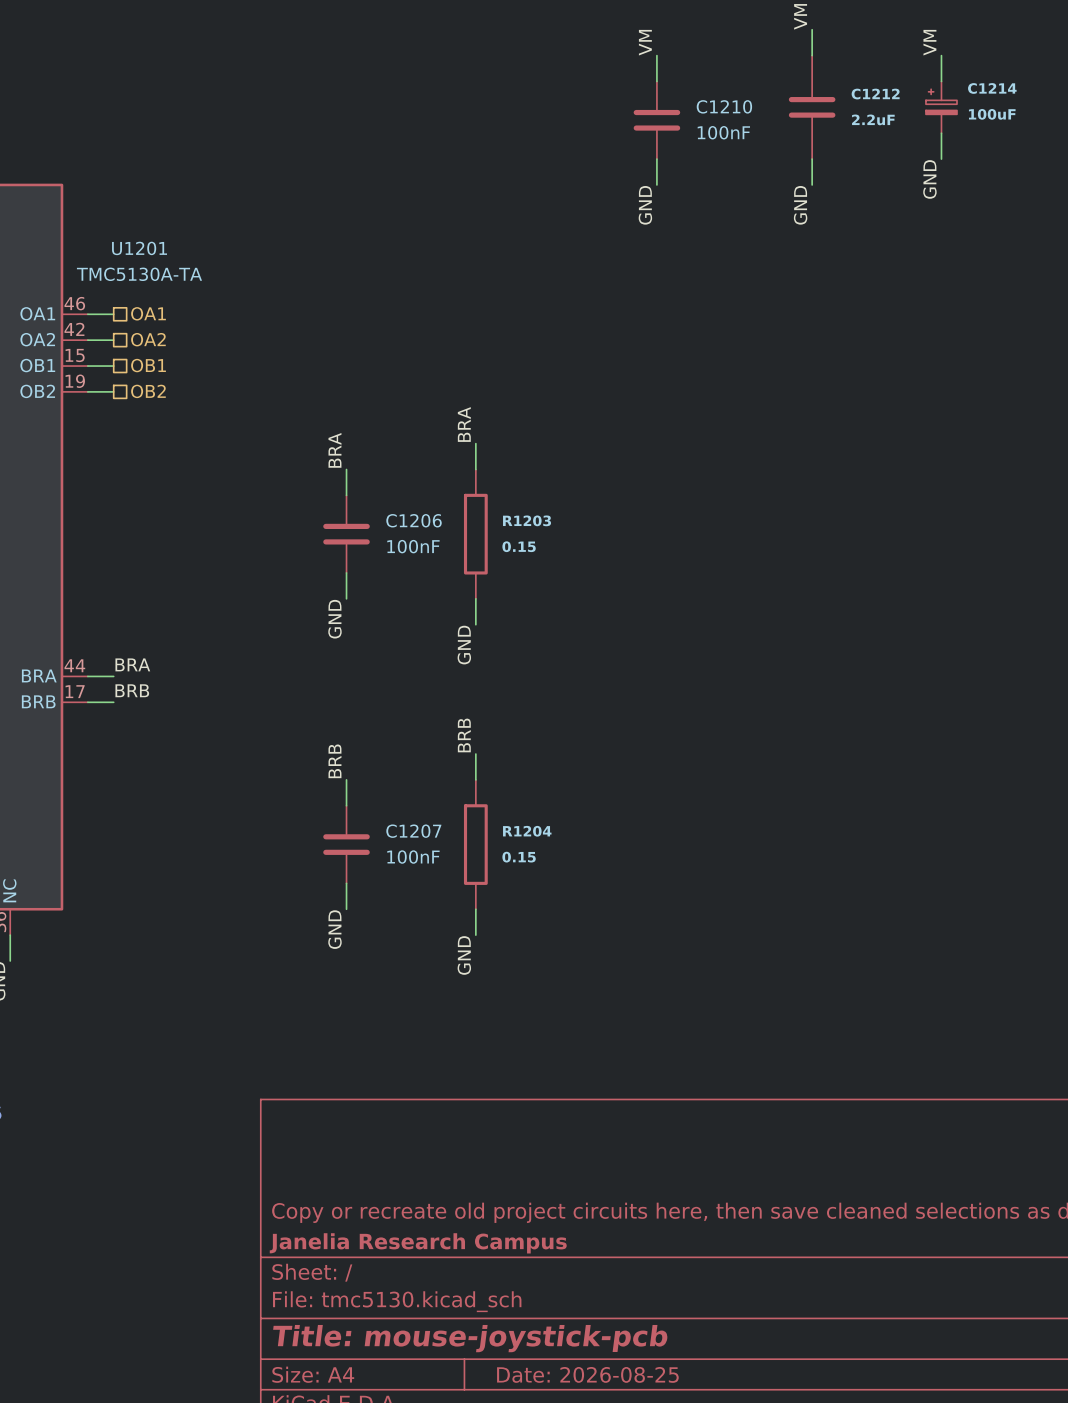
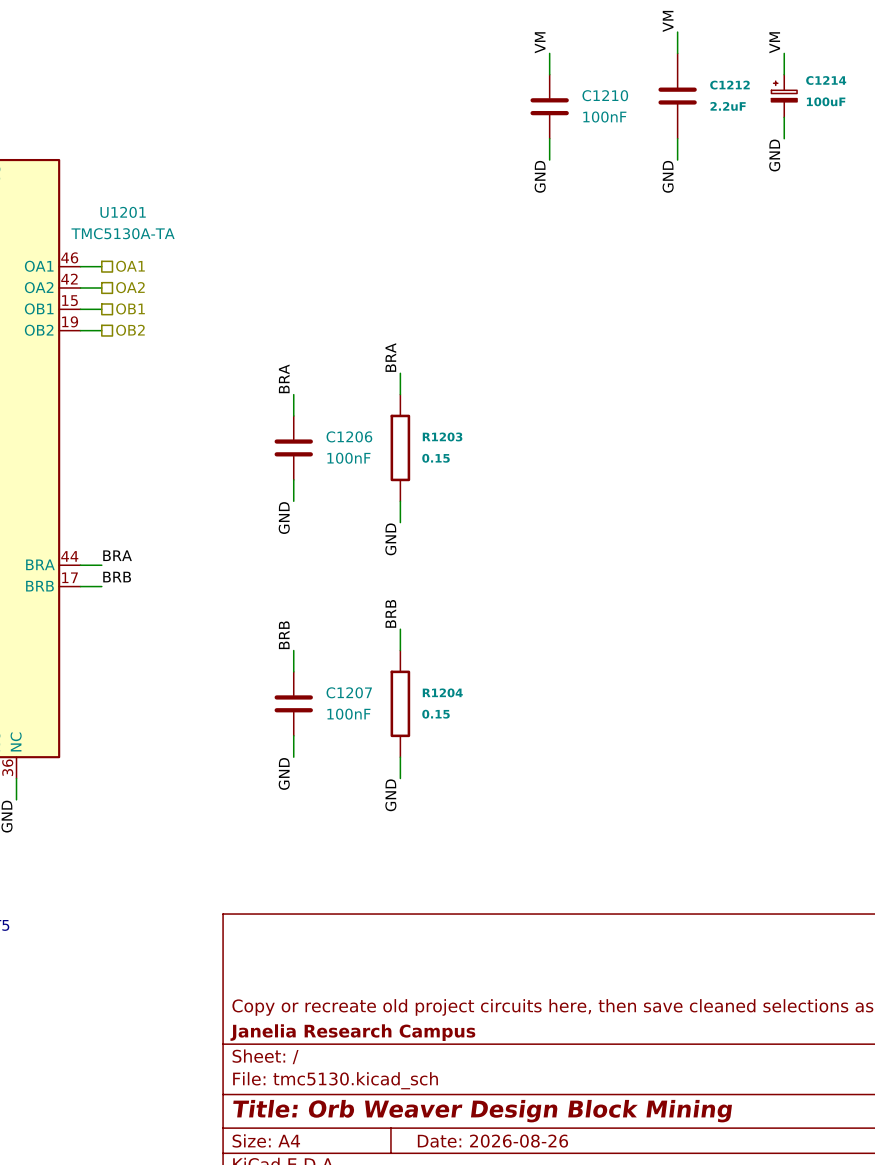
title block: Title: mouse-joystick-pcb (470, 1338) -> Title: Orb Weaver Design Block Mining (482, 1111)
title block: Date: 2026-08-25 (587, 1374) -> Date: 2026-08-26 (492, 1141)

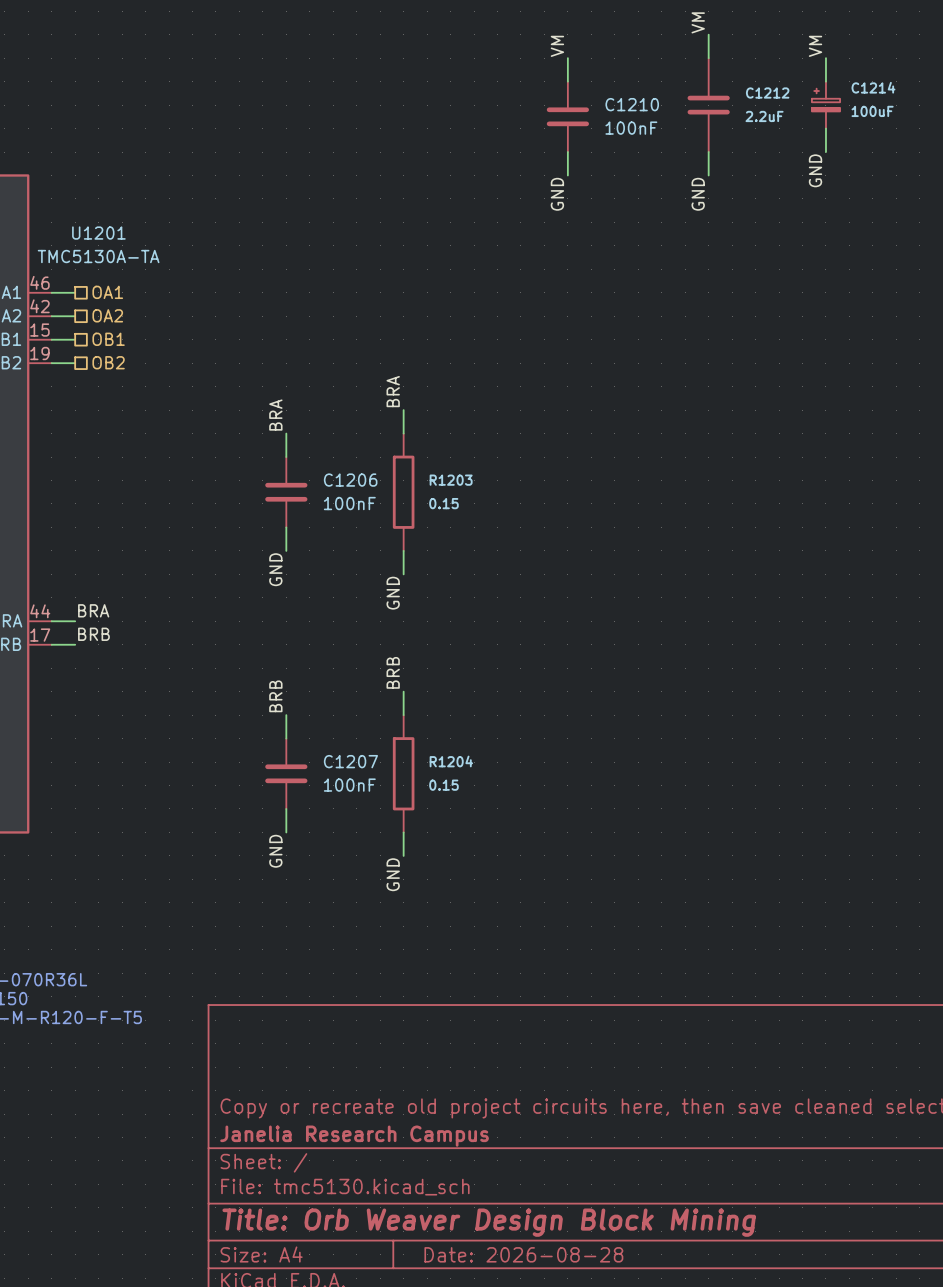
title block: Date: 2026-08-26 (492, 1141) -> Date: 2026-08-28 (523, 1254)

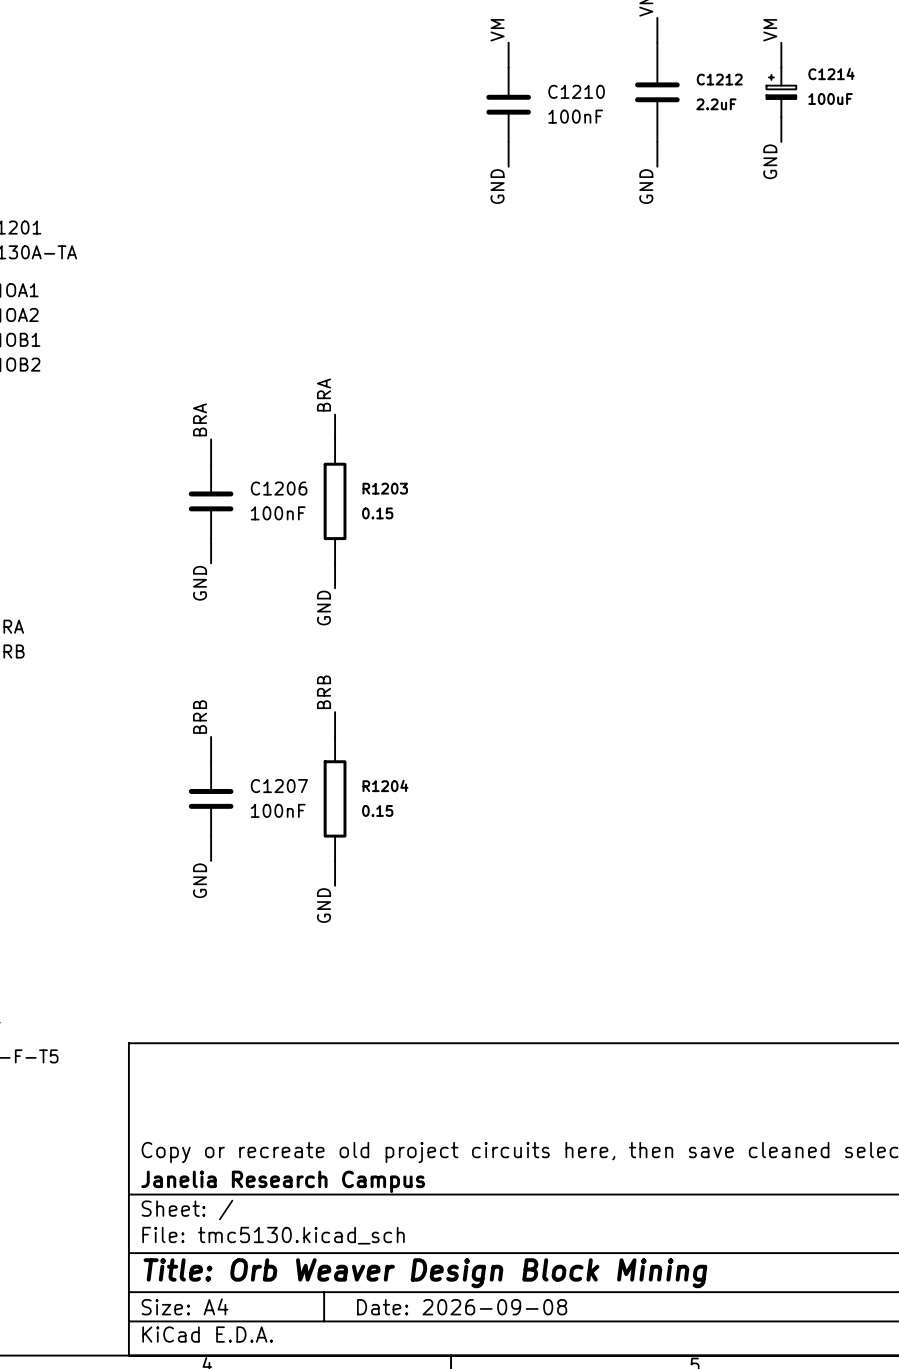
title block: Date: 2026-08-28 (523, 1254) -> Date: 2026-09-08 (462, 1307)

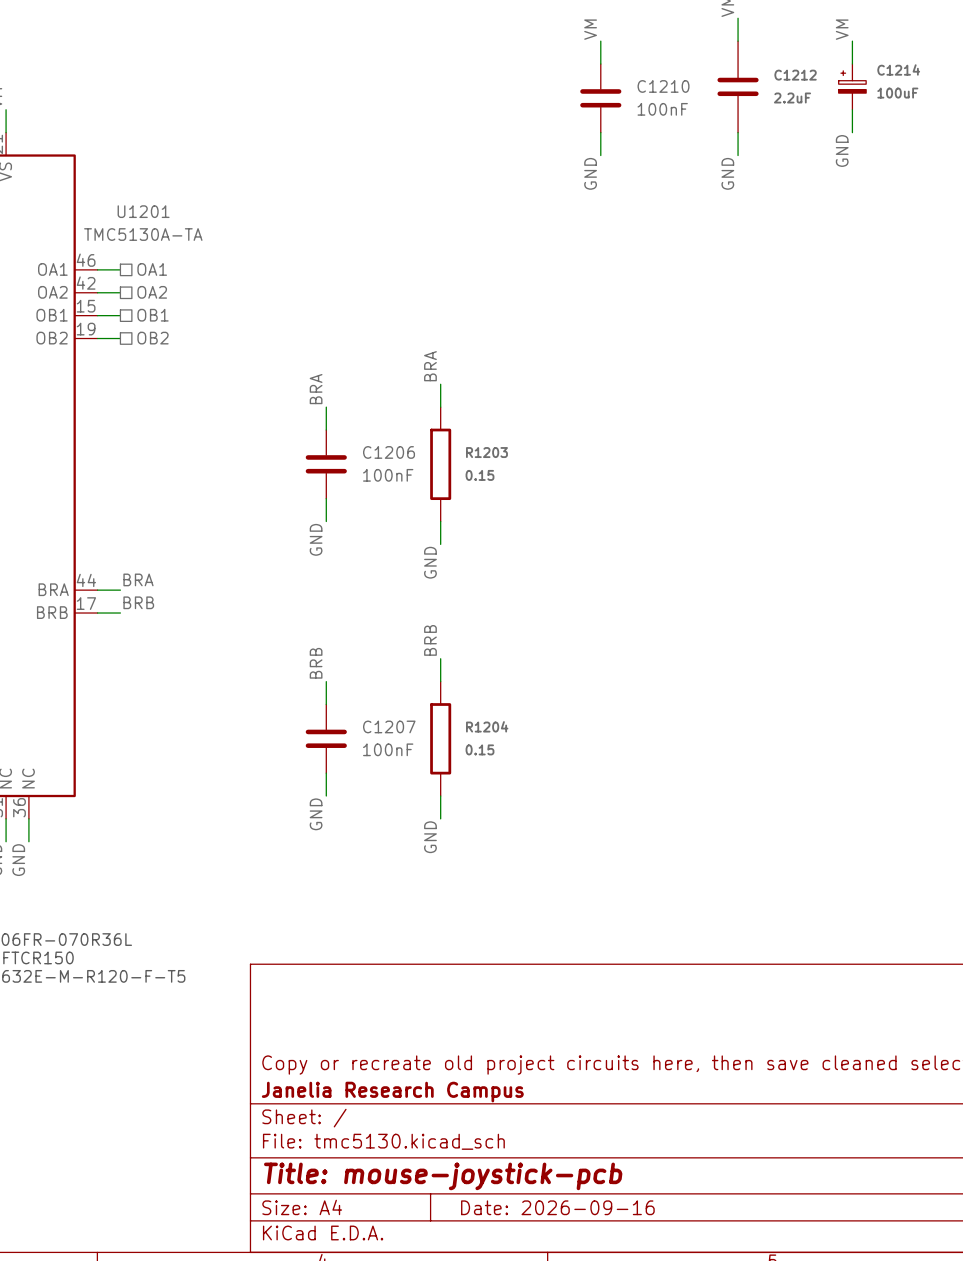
title block: Title: Orb Weaver Design Block Mining (425, 1273) -> Title: mouse-joystick-pcb (443, 1176)
title block: Date: 2026-09-08 (462, 1307) -> Date: 2026-09-16 (557, 1207)

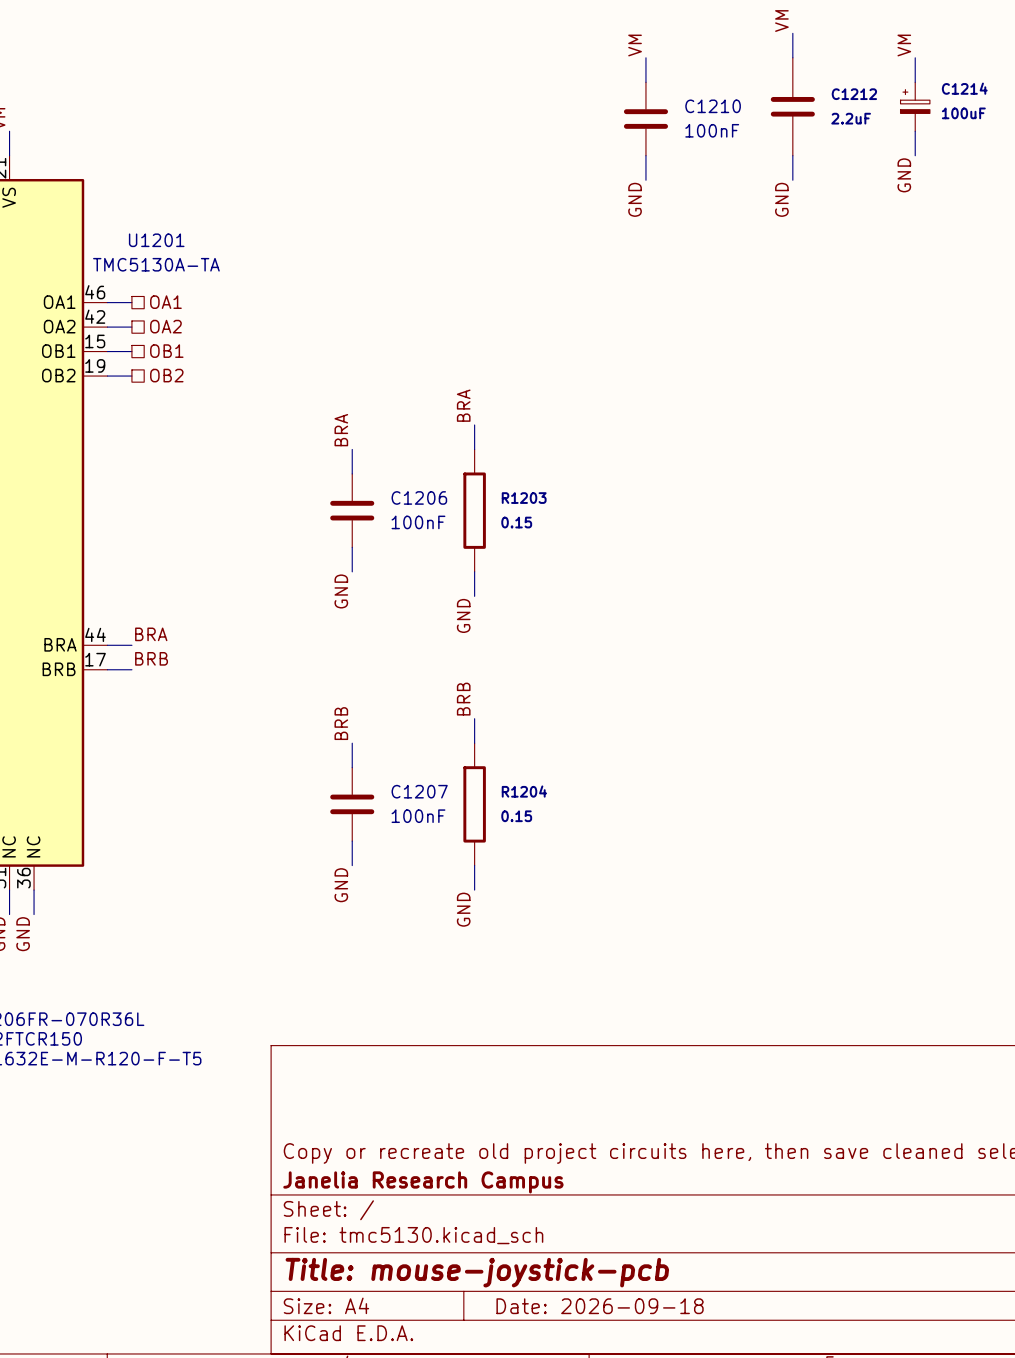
title block: Date: 2026-09-16 (557, 1207) -> Date: 2026-09-18 (600, 1306)

